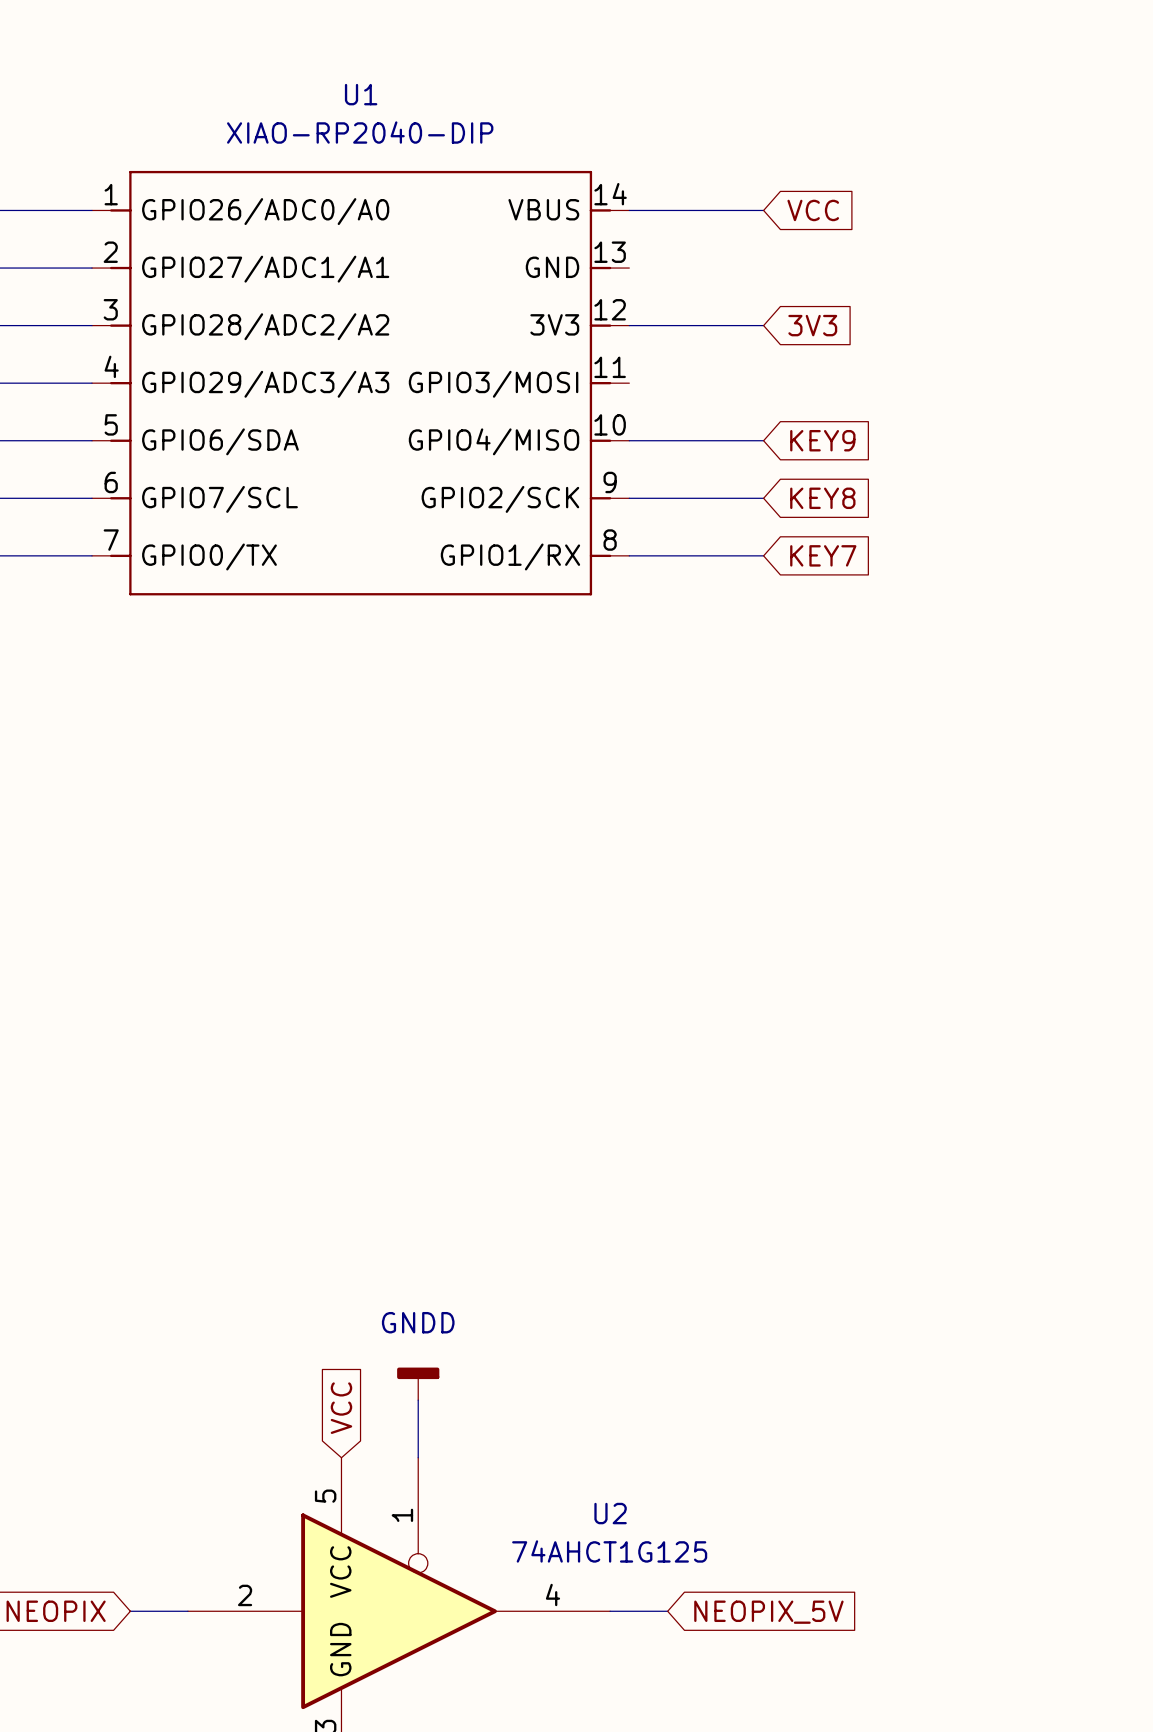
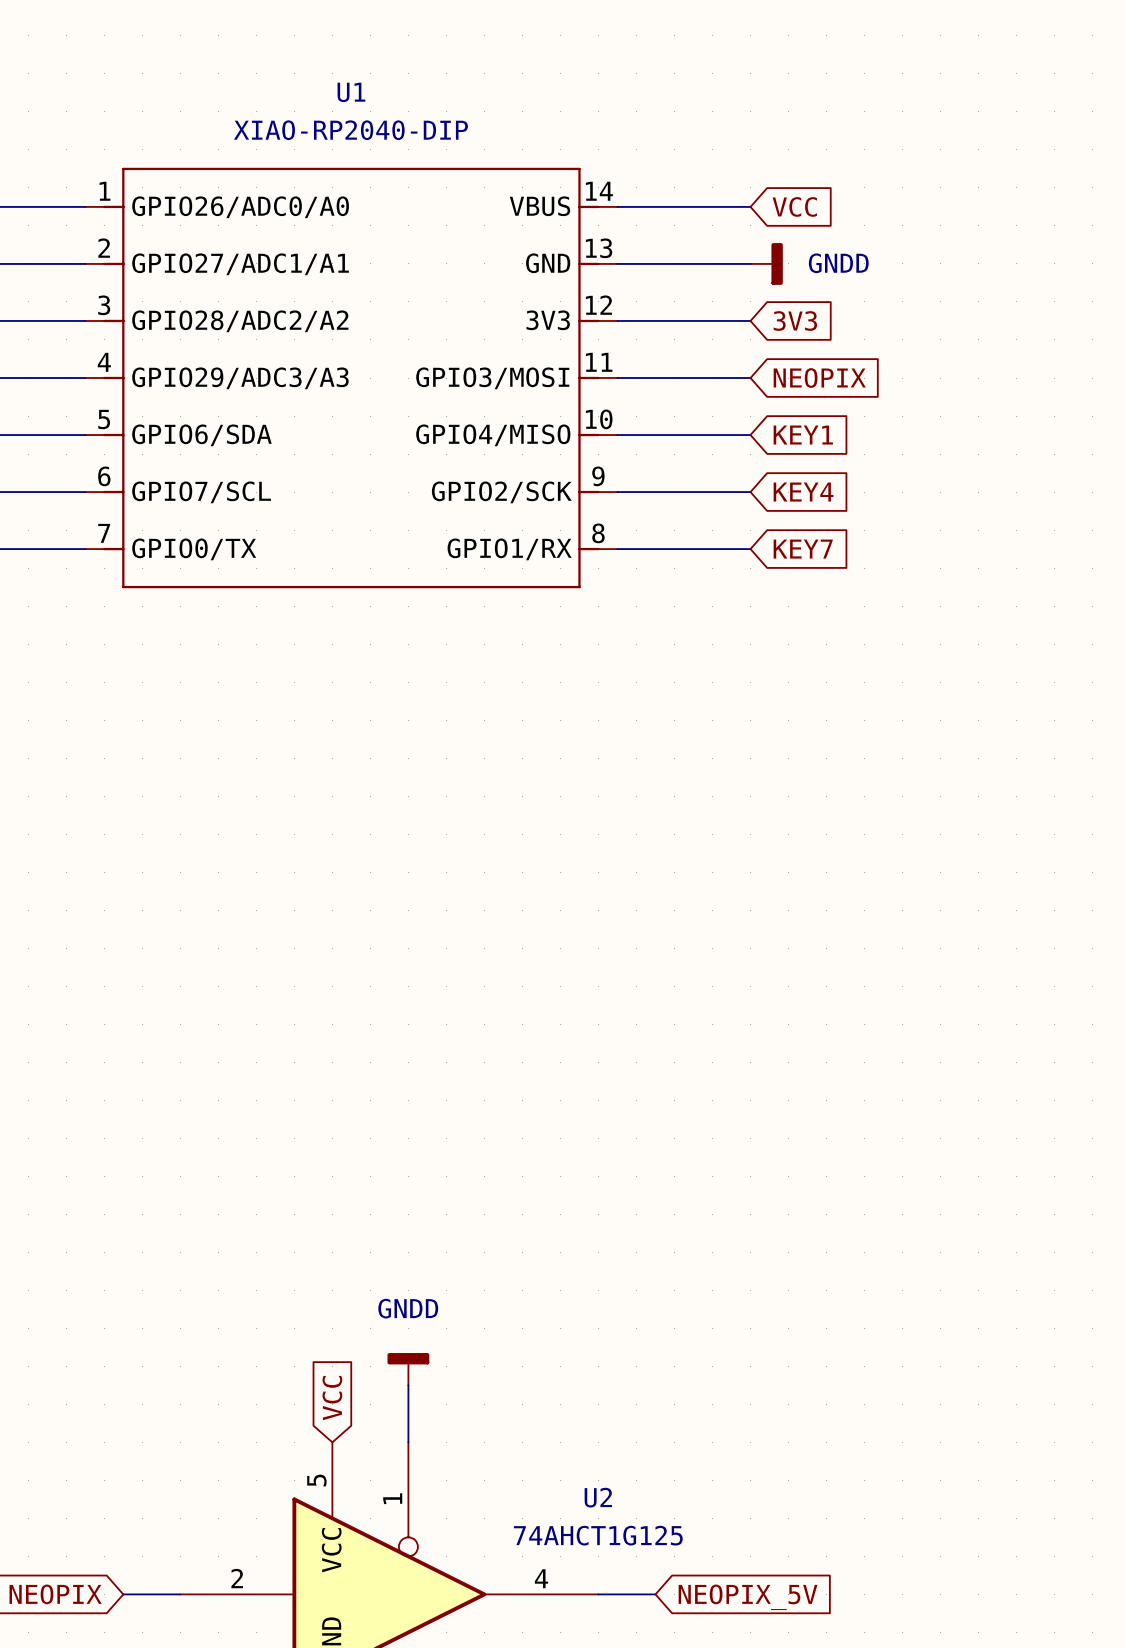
wire: none -> (617, 263) (750, 263)
power symbol: none -> GNDD (766, 263)
wire: none -> (617, 378) (750, 378)
global label: none -> NEOPIX (819, 378)
global label: KEY9 (822, 440) -> KEY1 (803, 435)
global label: KEY8 (822, 498) -> KEY4 (803, 492)

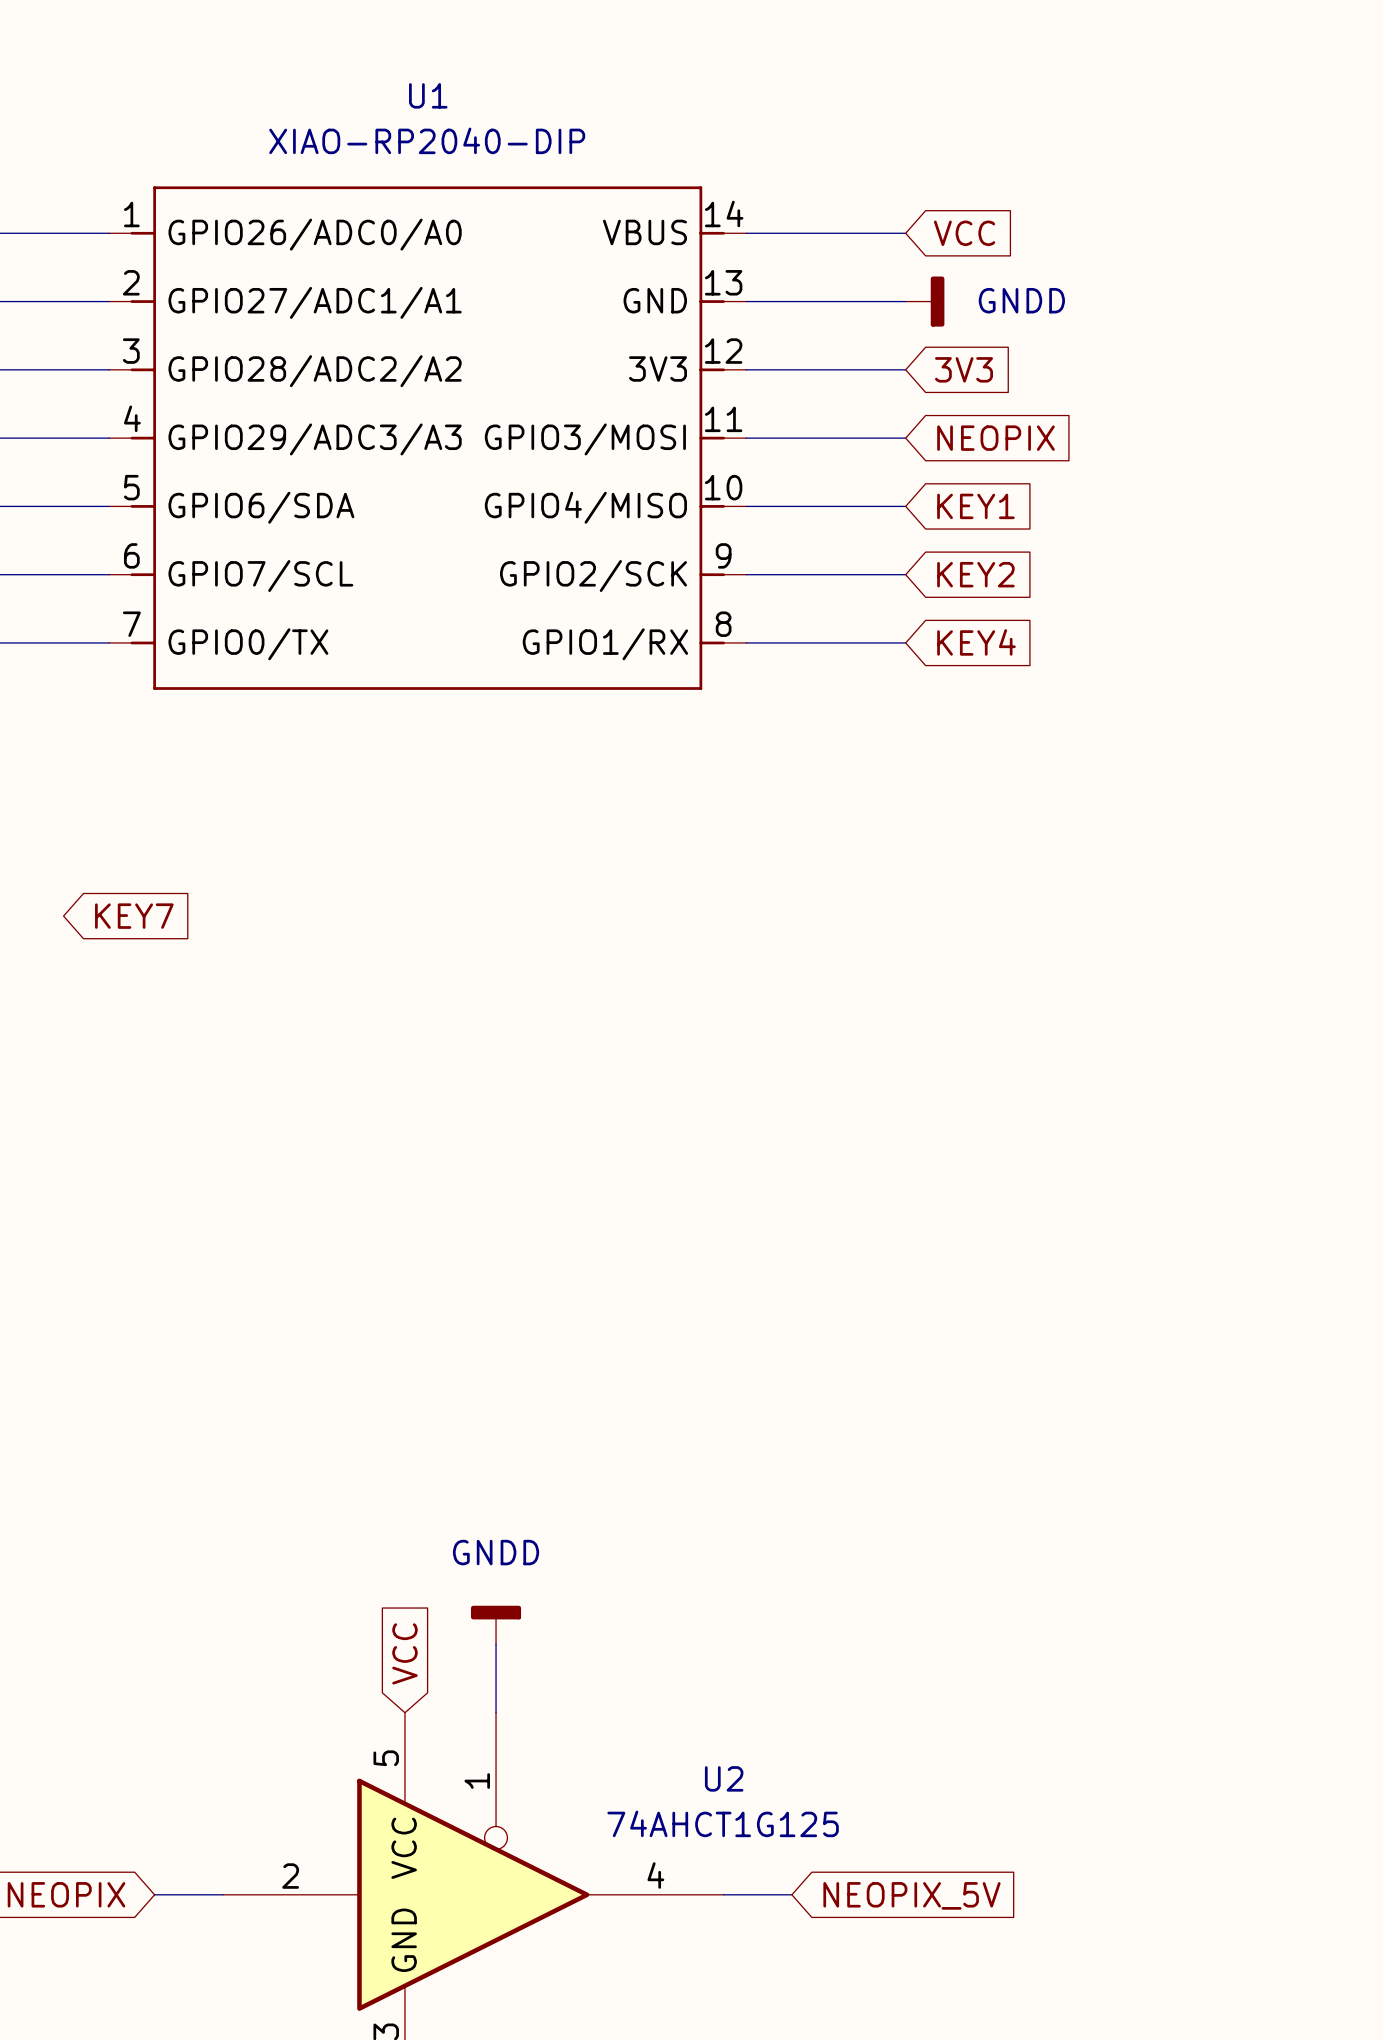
global label: KEY4 (803, 492) -> KEY2 (975, 574)
global label: KEY7 (803, 549) -> KEY4 (976, 642)
global label: none -> KEY7 (134, 916)

